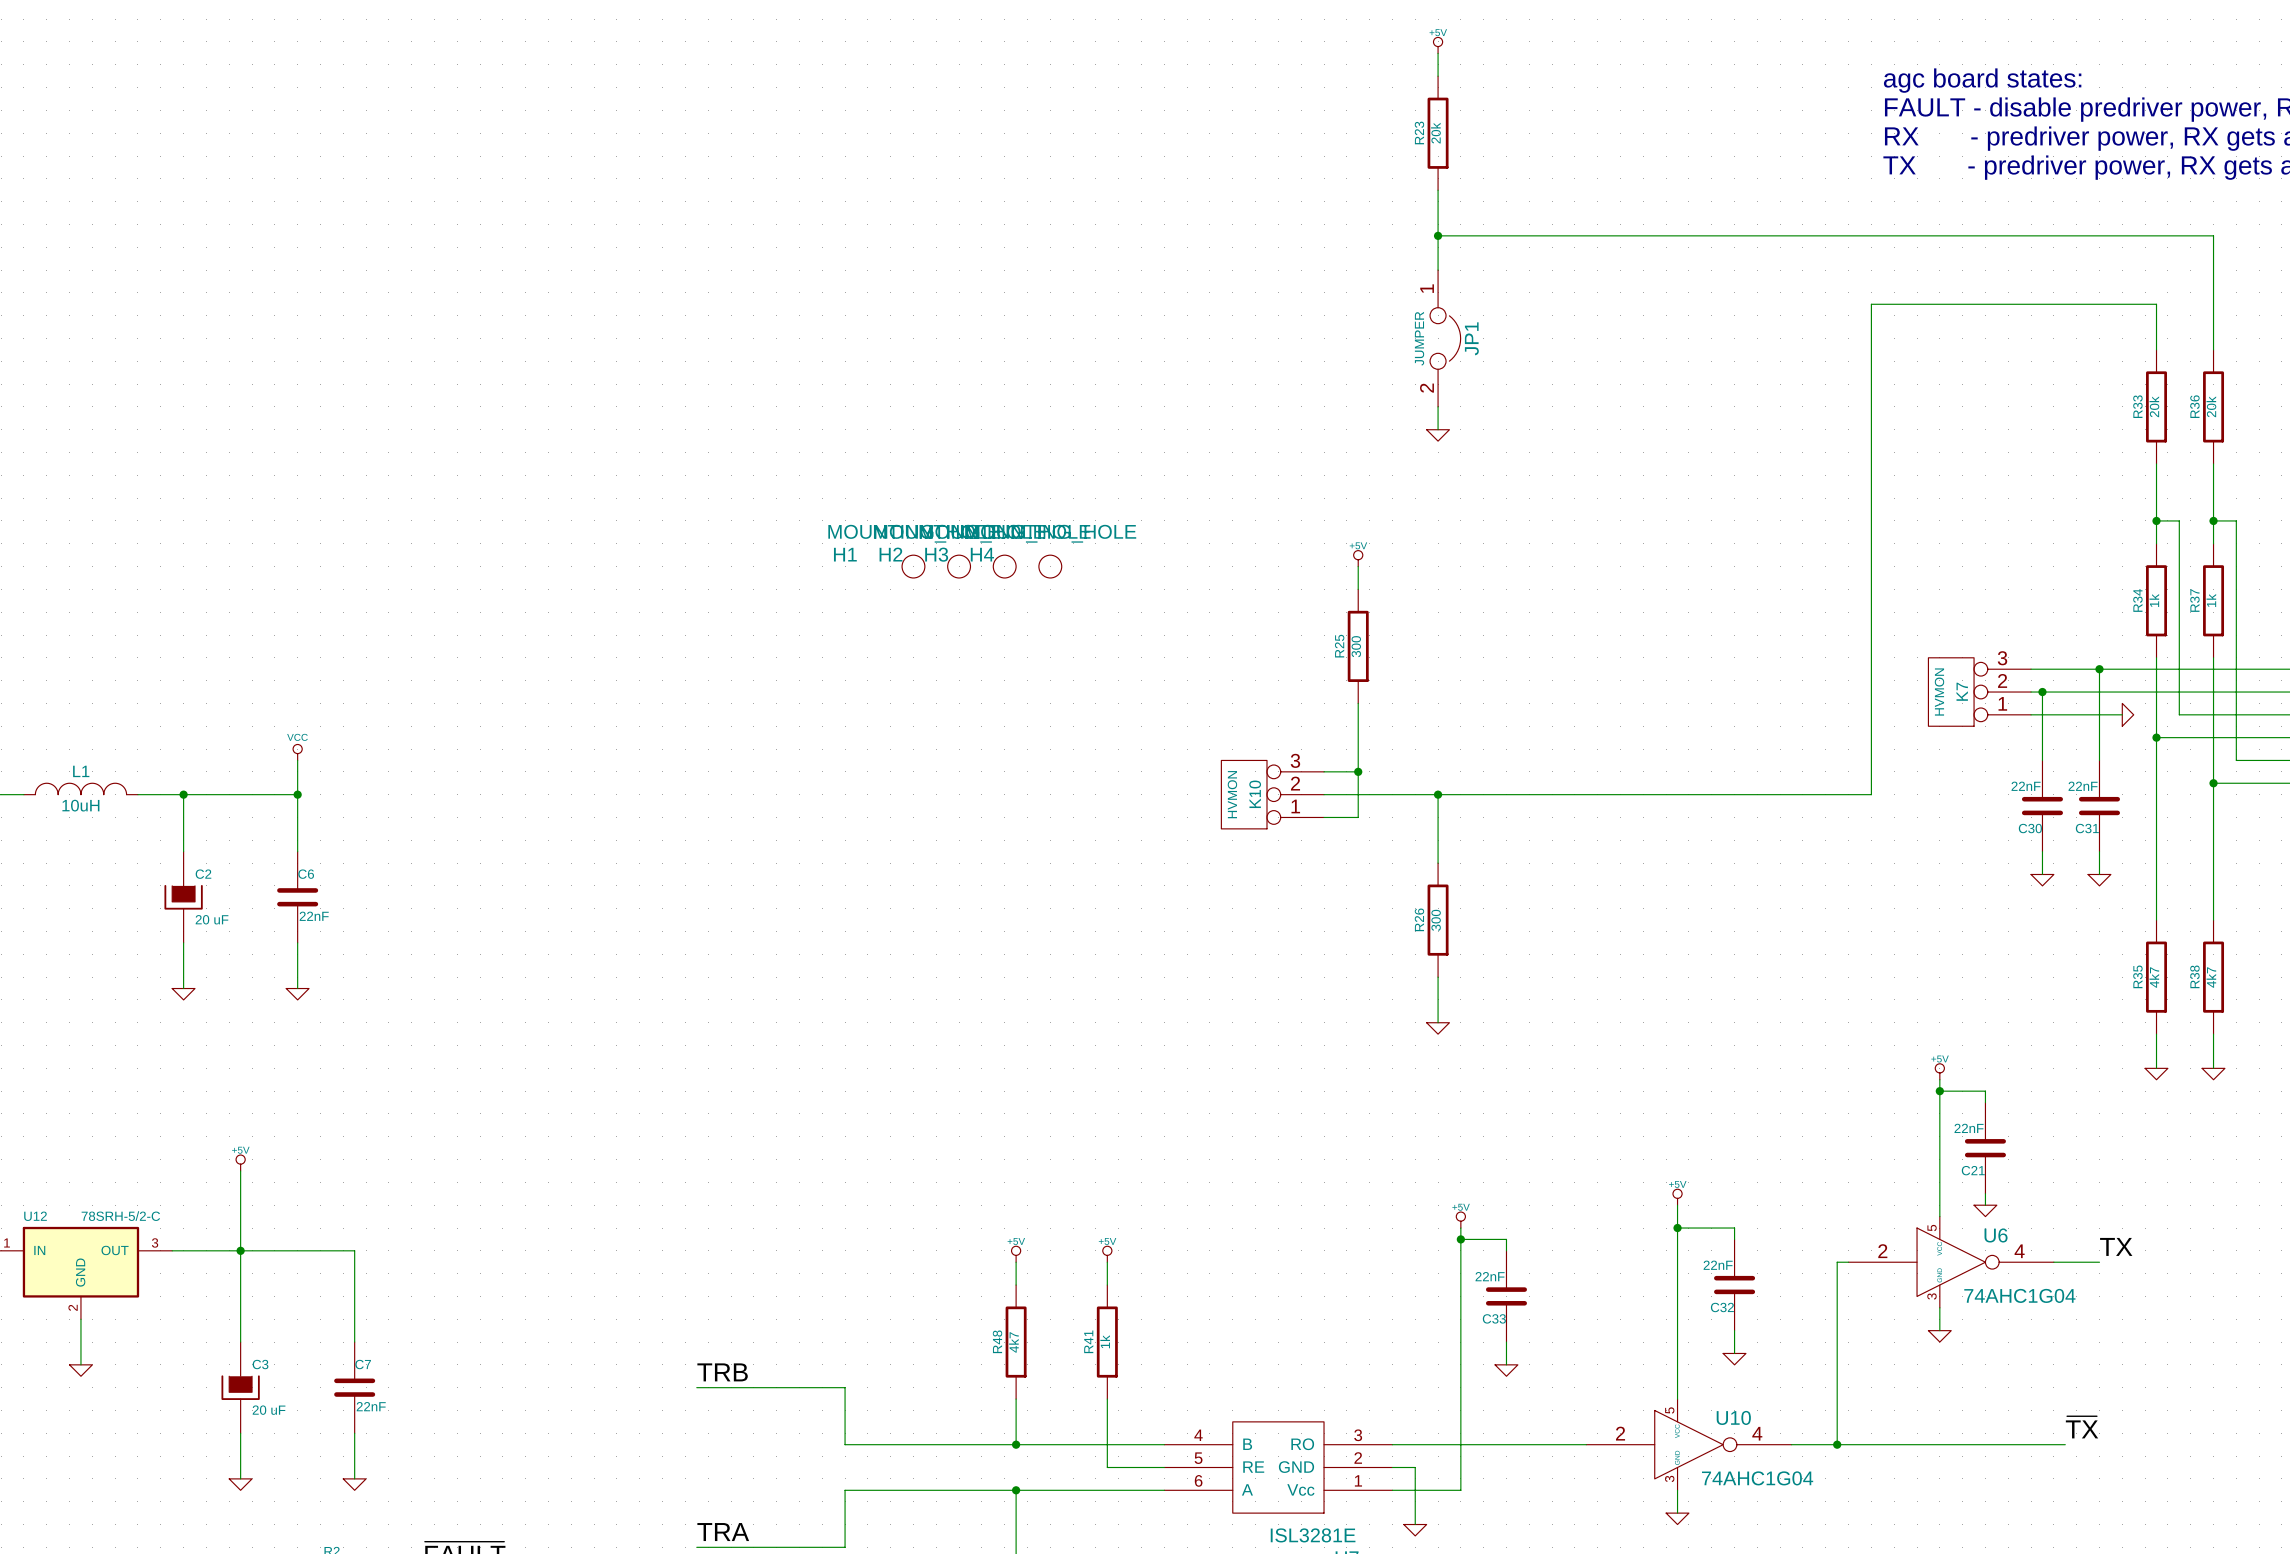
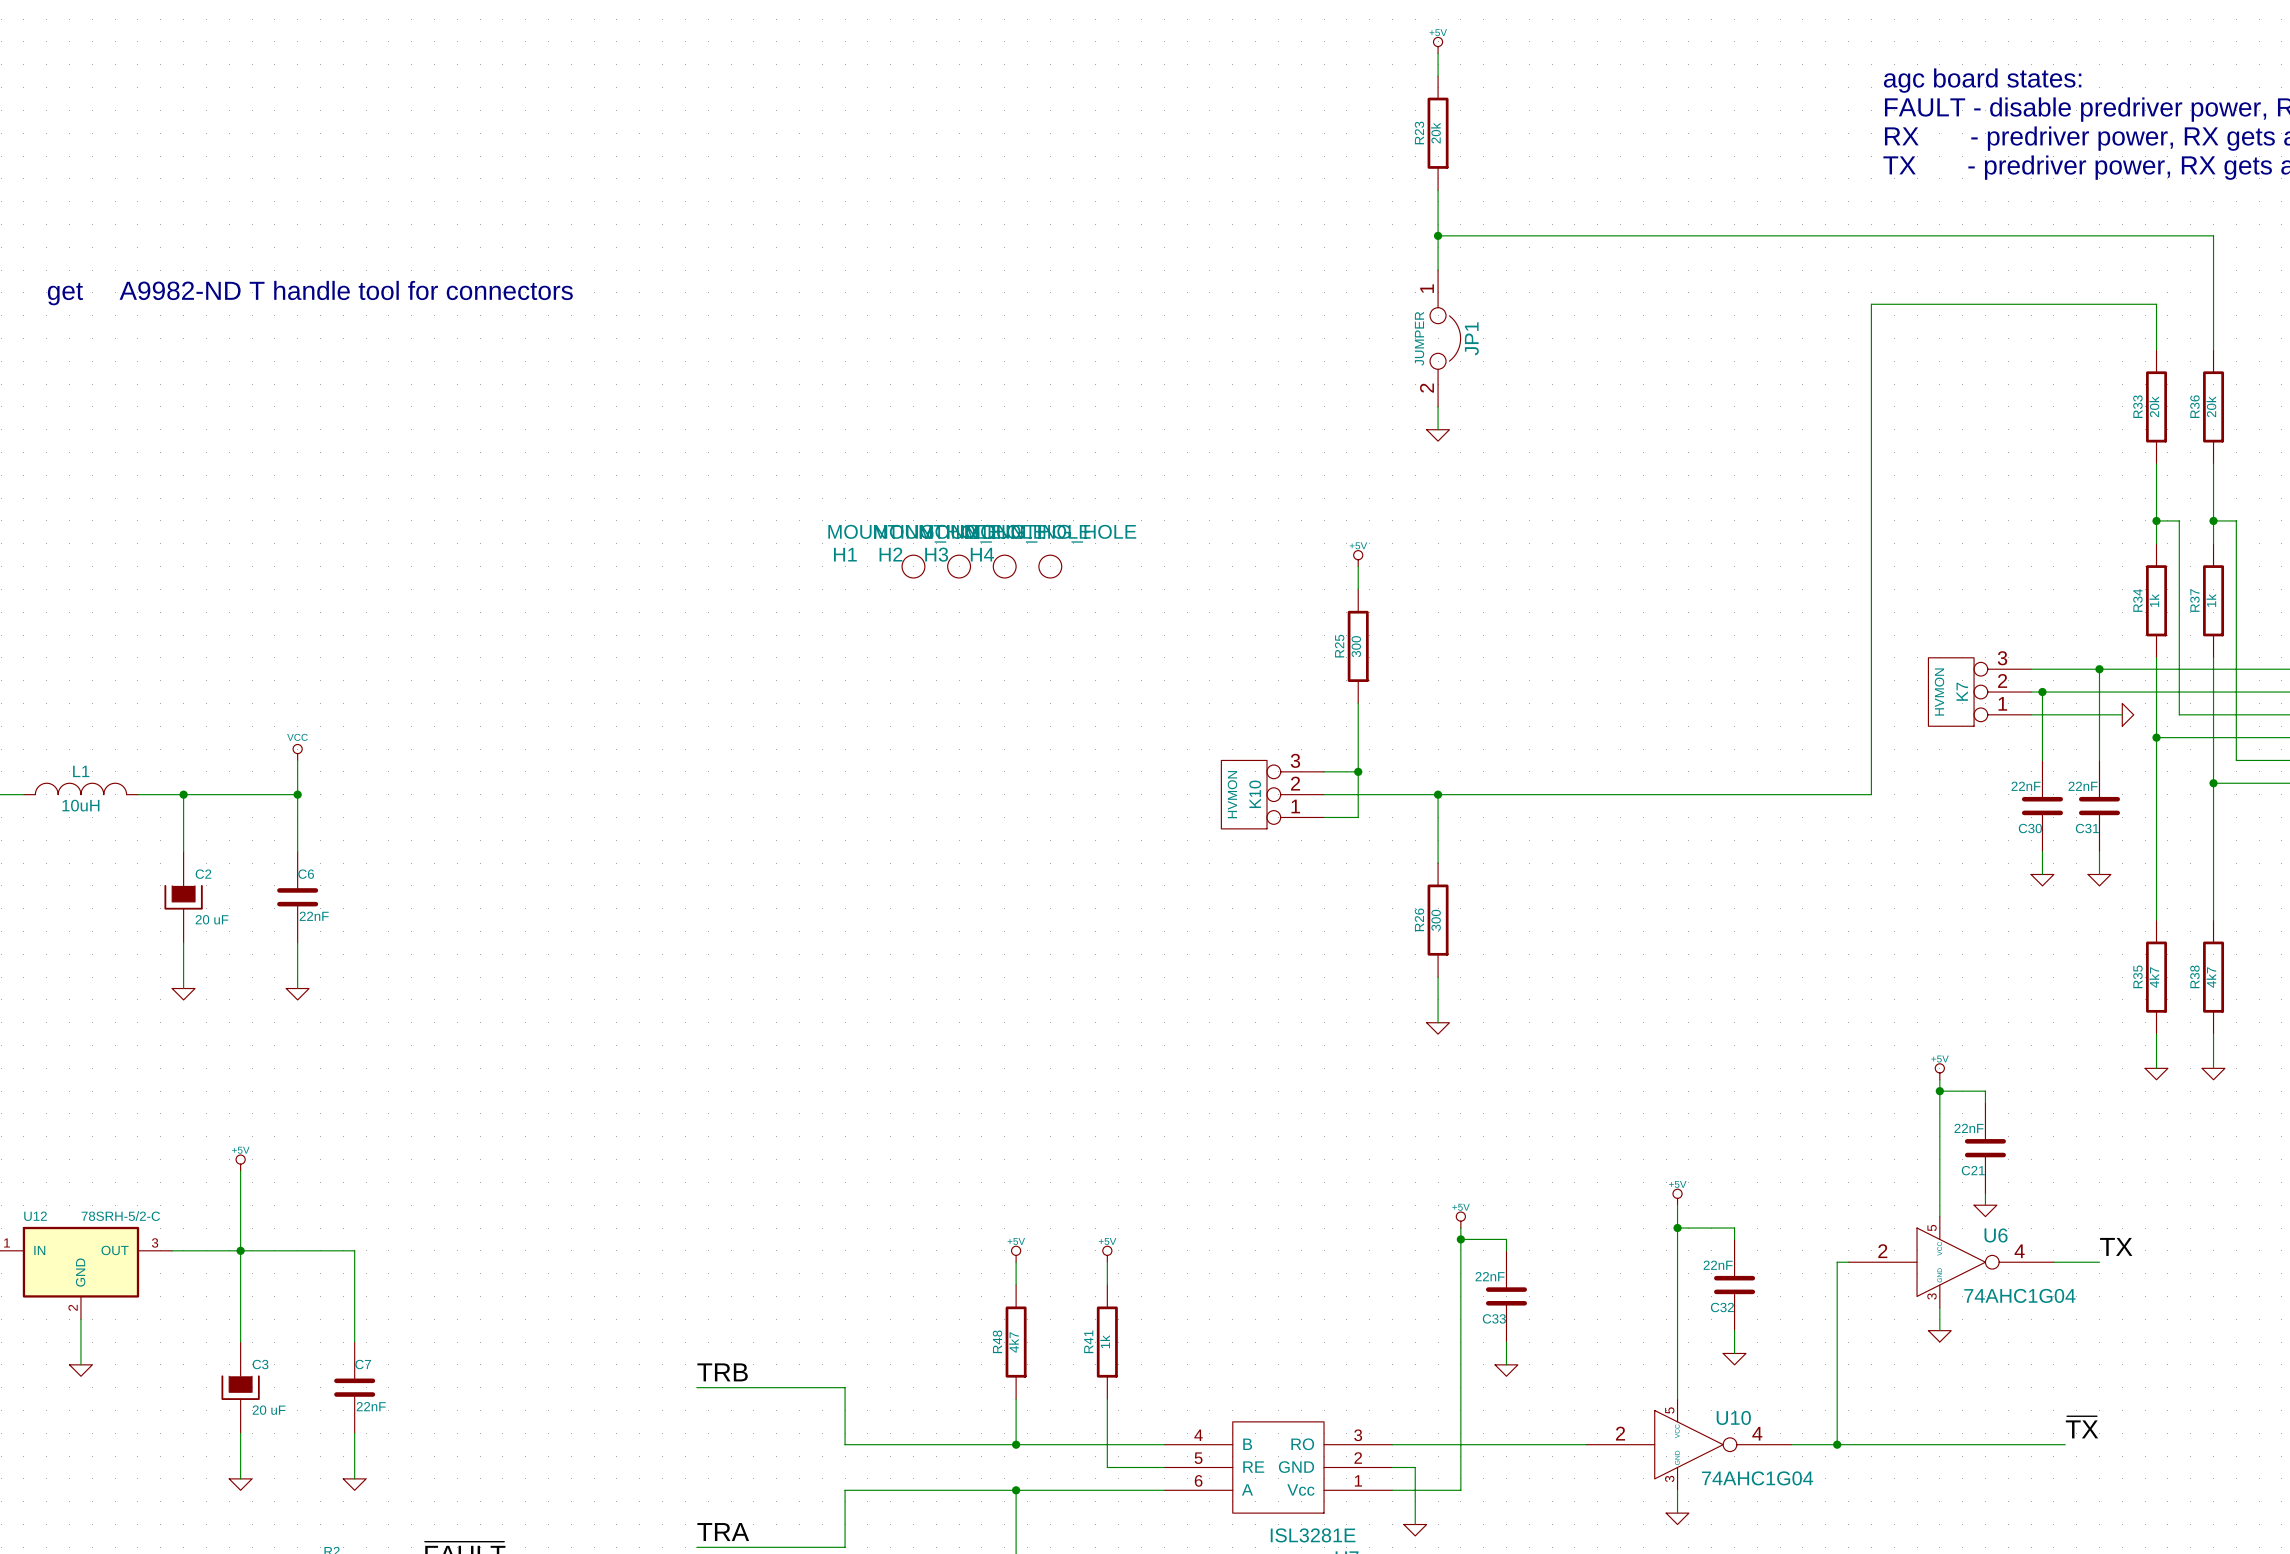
text: none -> get A9982-ND T handle tool for connectors (310, 293)

